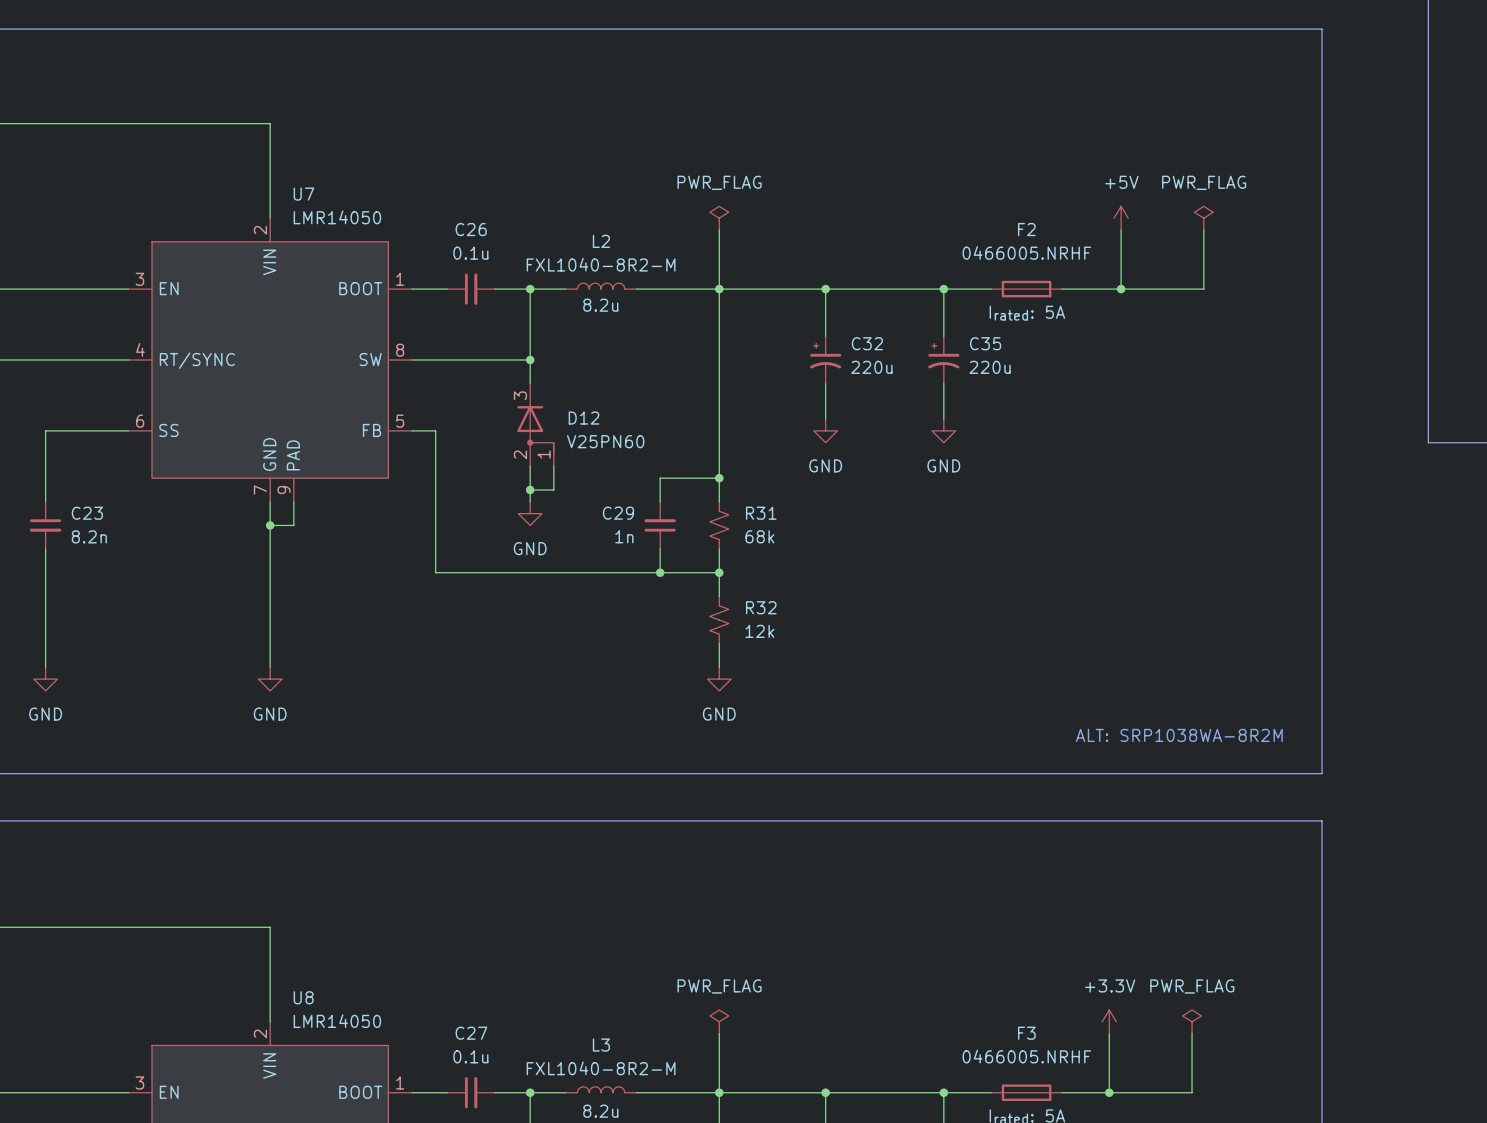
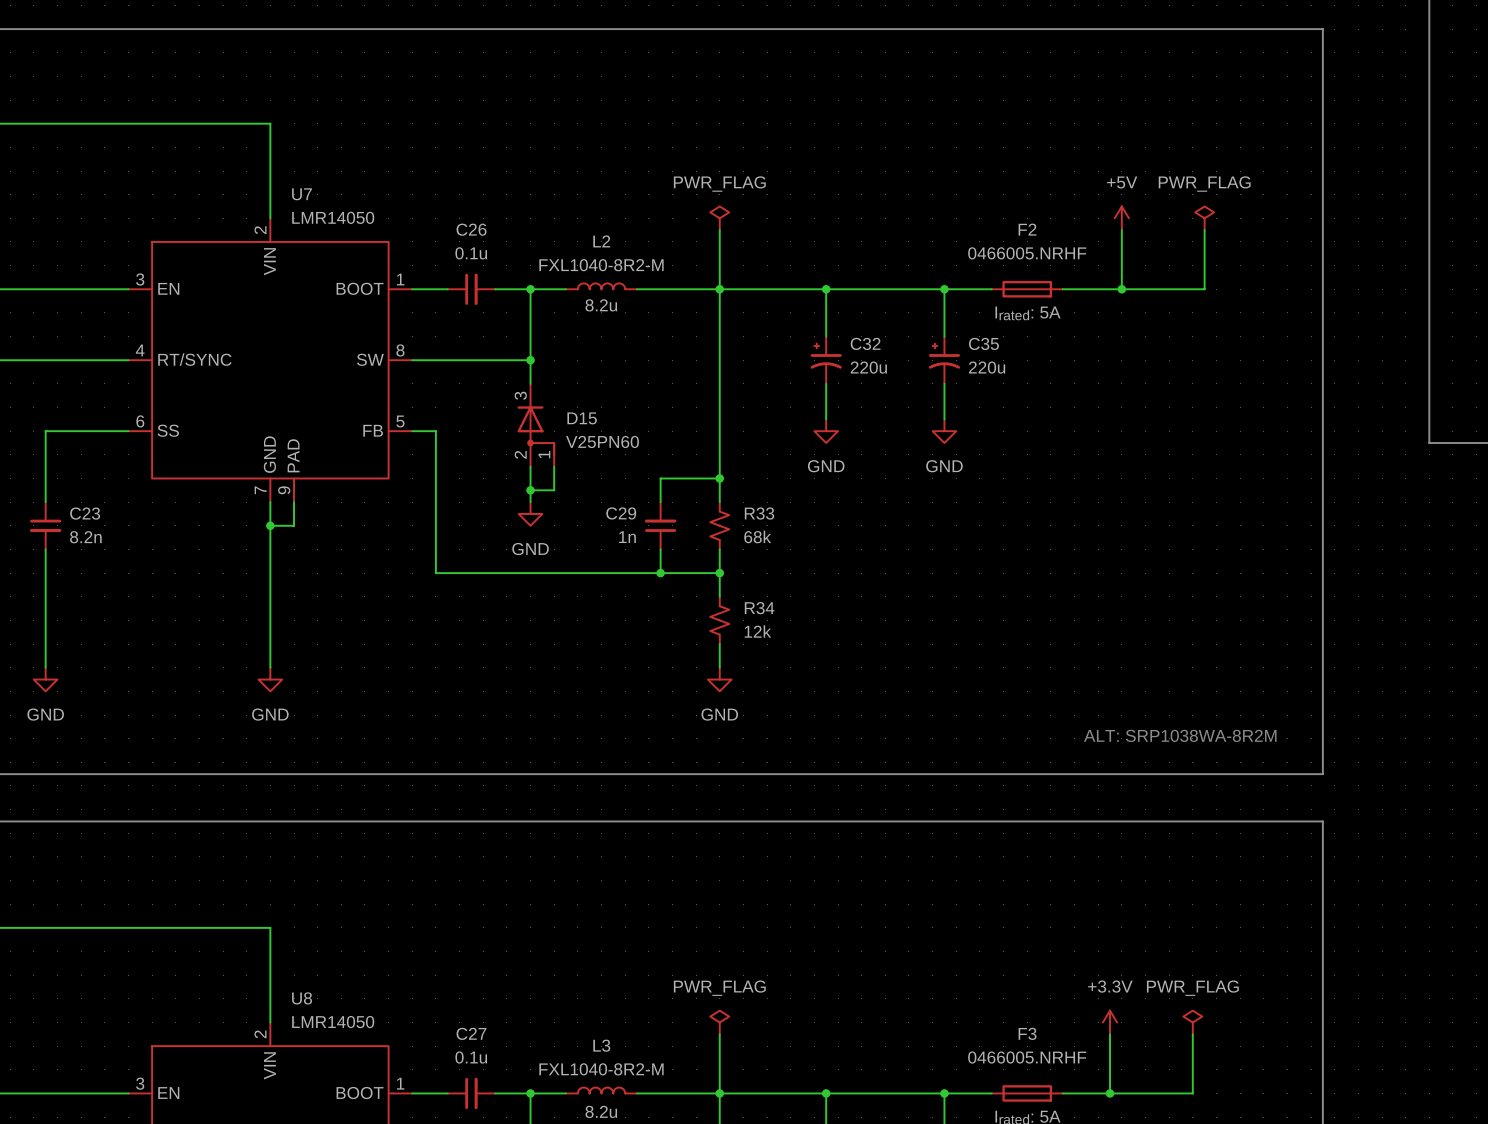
D12 name: D12 (584, 418) -> D15 (582, 418)
R31 name: R31 (761, 513) -> R33 (759, 513)
R32 name: R32 (761, 607) -> R34 (759, 608)

